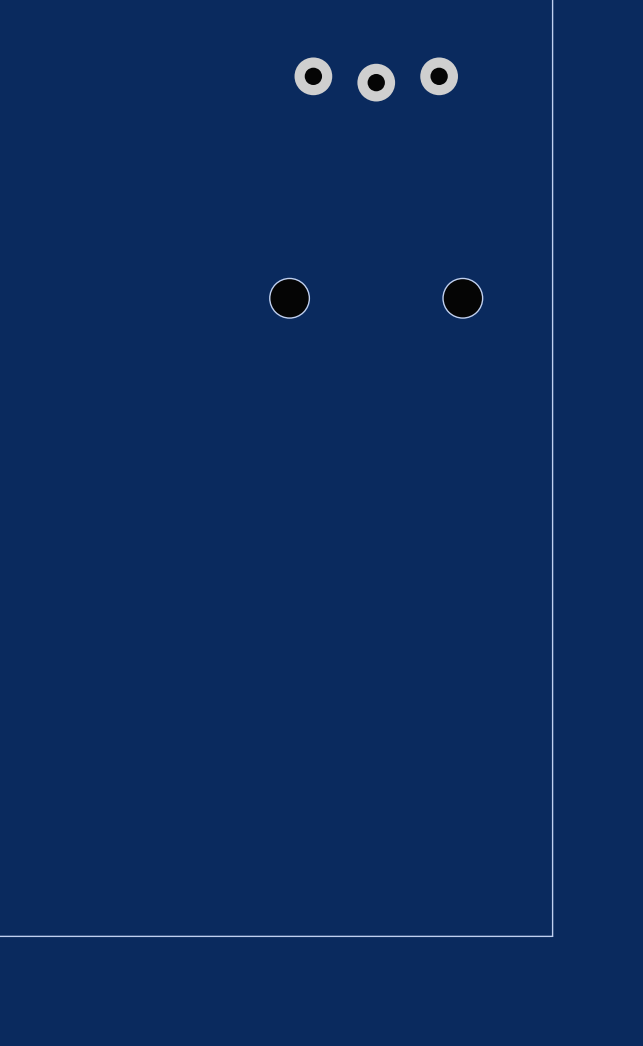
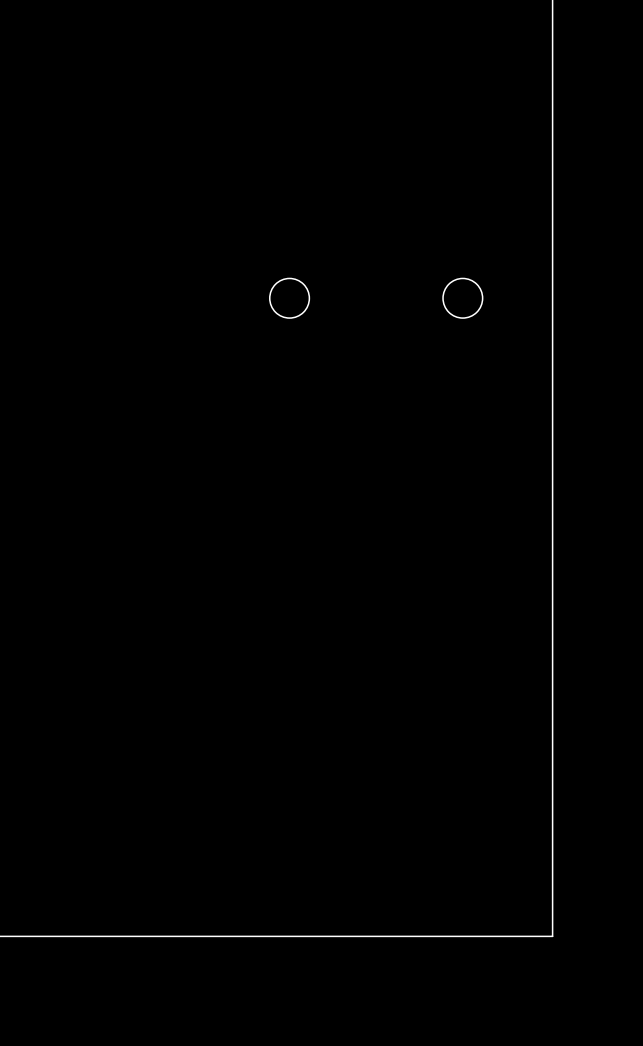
part: (376, 79) -> none

